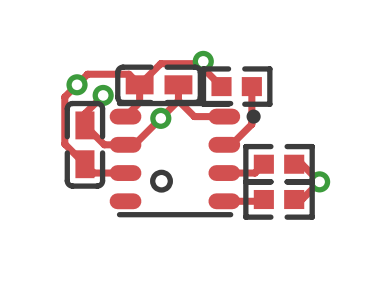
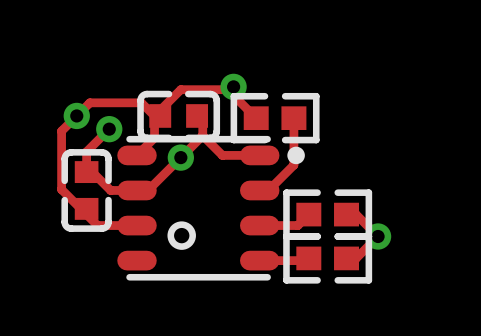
part footprint: [115, 64, 203, 106] -> [137, 90, 221, 142]
part footprint: [64, 100, 106, 189] -> [61, 149, 112, 232]

